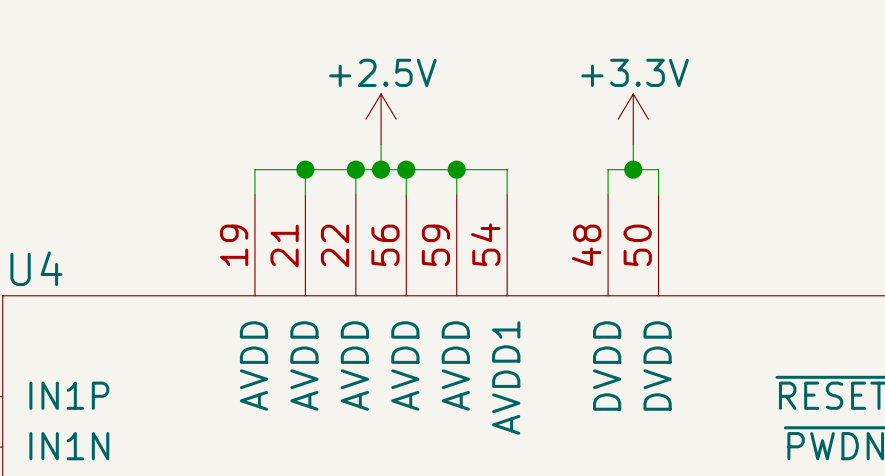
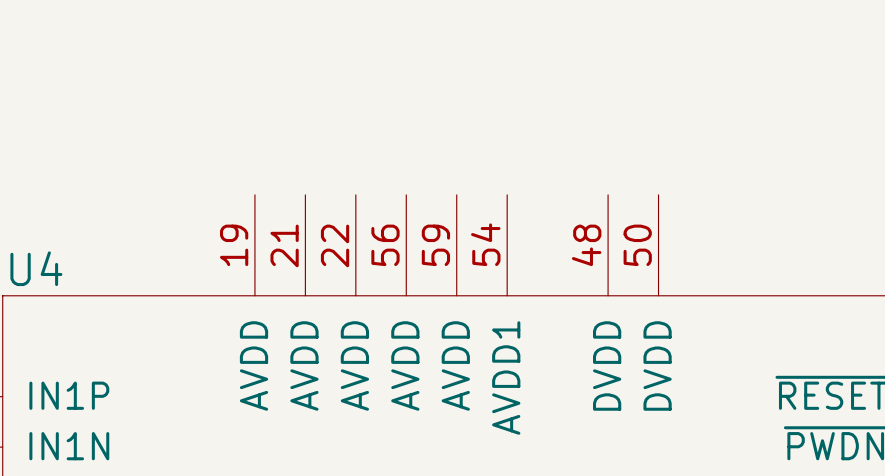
power symbol: +2.5V (381, 119) -> none
power symbol: +3.3V (633, 119) -> none
wire: (381, 144) (381, 169) -> none
wire: (633, 144) (633, 169) -> none
wire: (305, 169) (305, 194) -> none
junction: (305, 169) -> none
wire: (355, 169) (355, 194) -> none
junction: (355, 169) -> none
junction: (381, 169) -> none
wire: (406, 169) (406, 194) -> none
junction: (406, 169) -> none
wire: (456, 169) (456, 194) -> none
junction: (456, 169) -> none
junction: (633, 169) -> none
wire: (254, 194) (254, 169) (507, 169) (507, 194) -> none
wire: (608, 194) (608, 169) (658, 169) (658, 194) -> none

